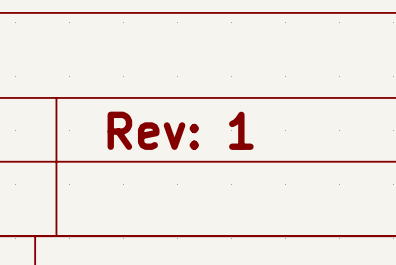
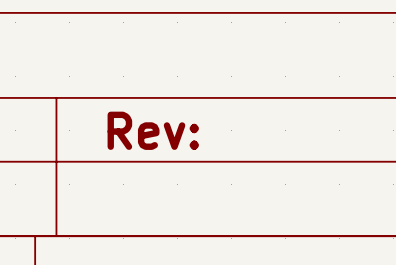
title block: Rev: 1 (180, 130) -> Rev: (153, 130)

